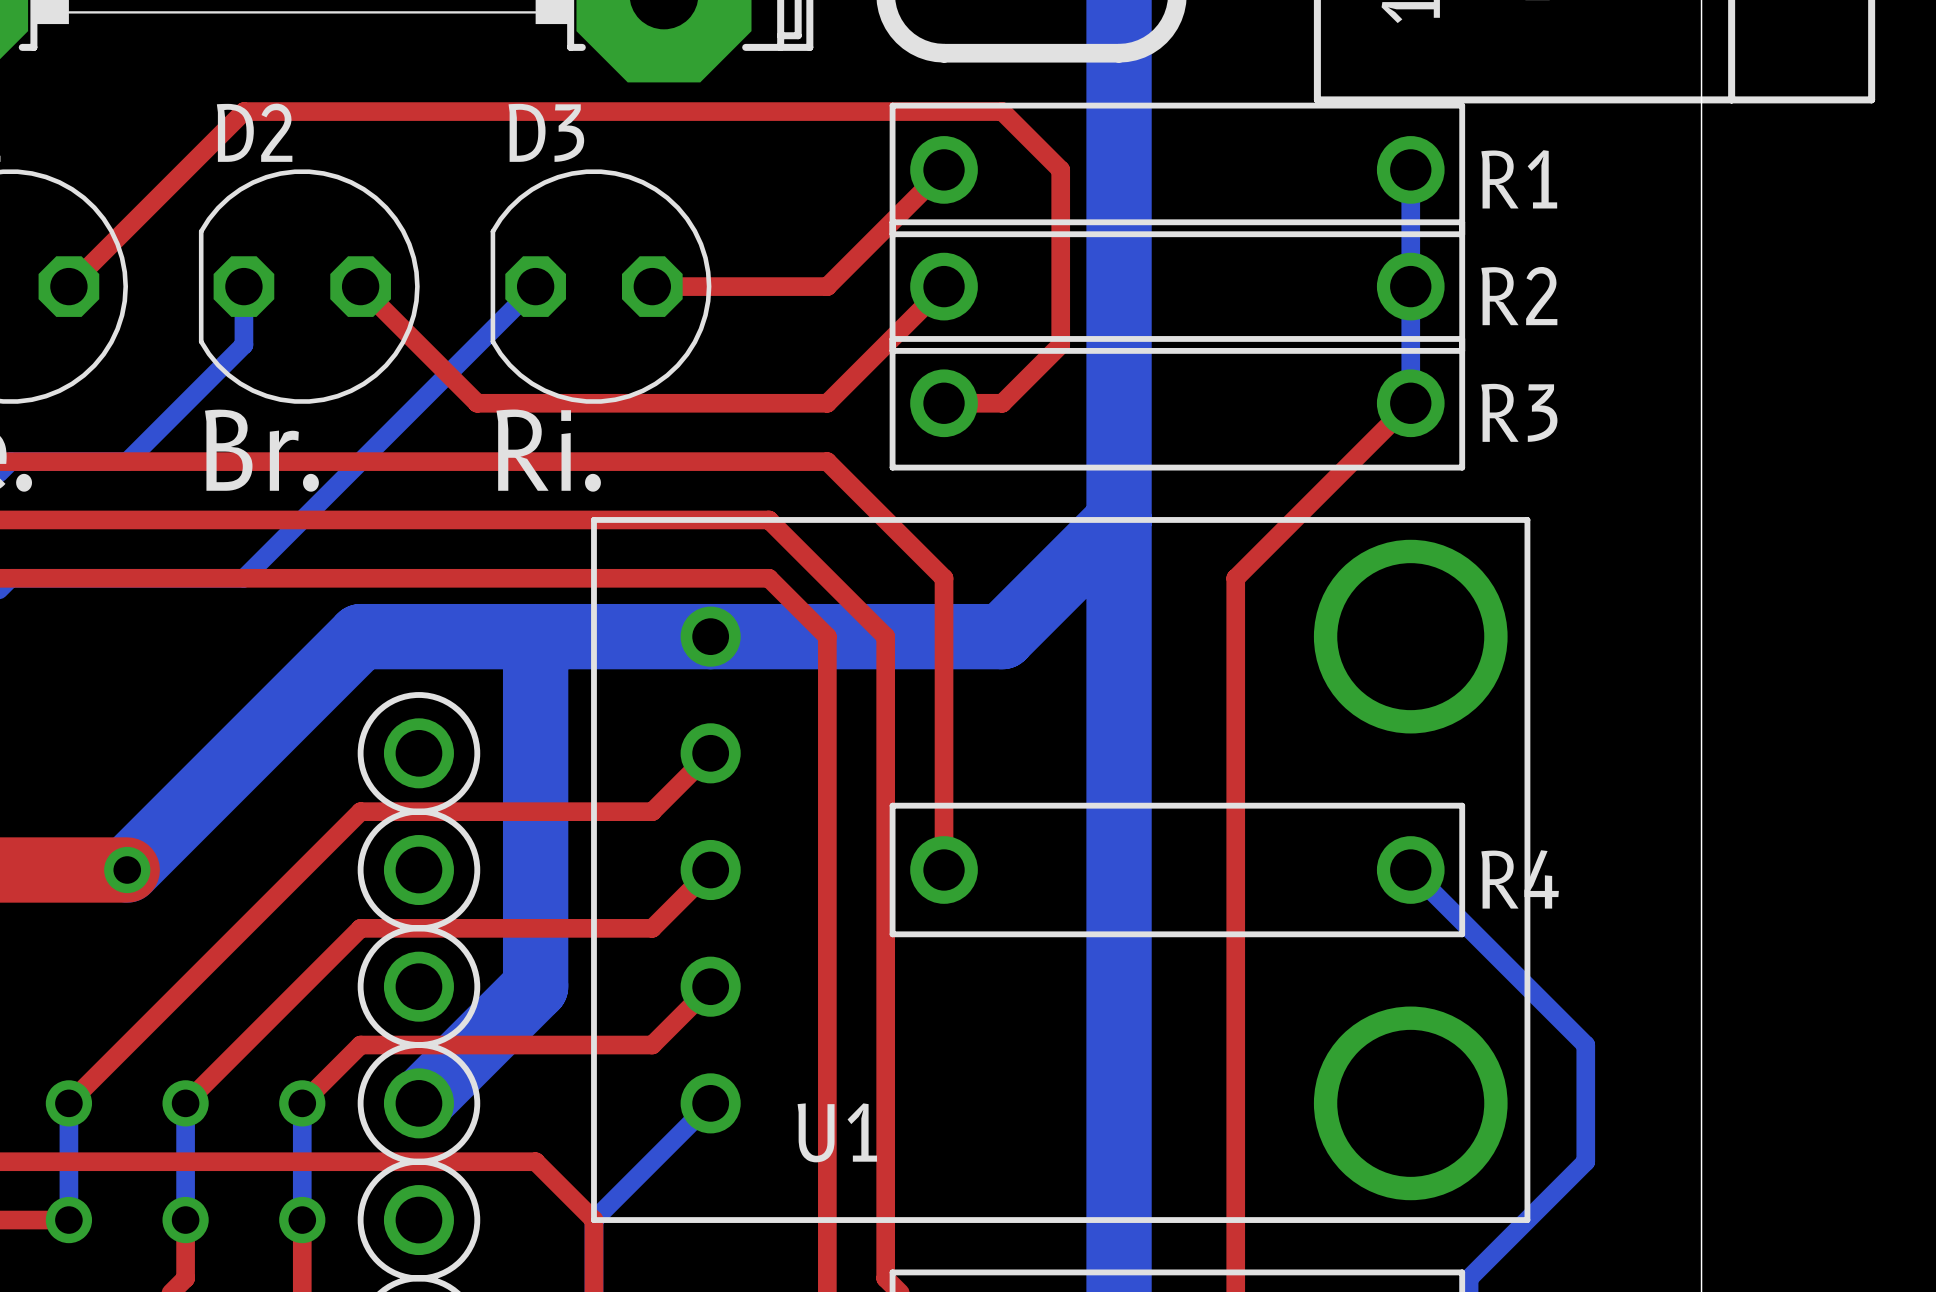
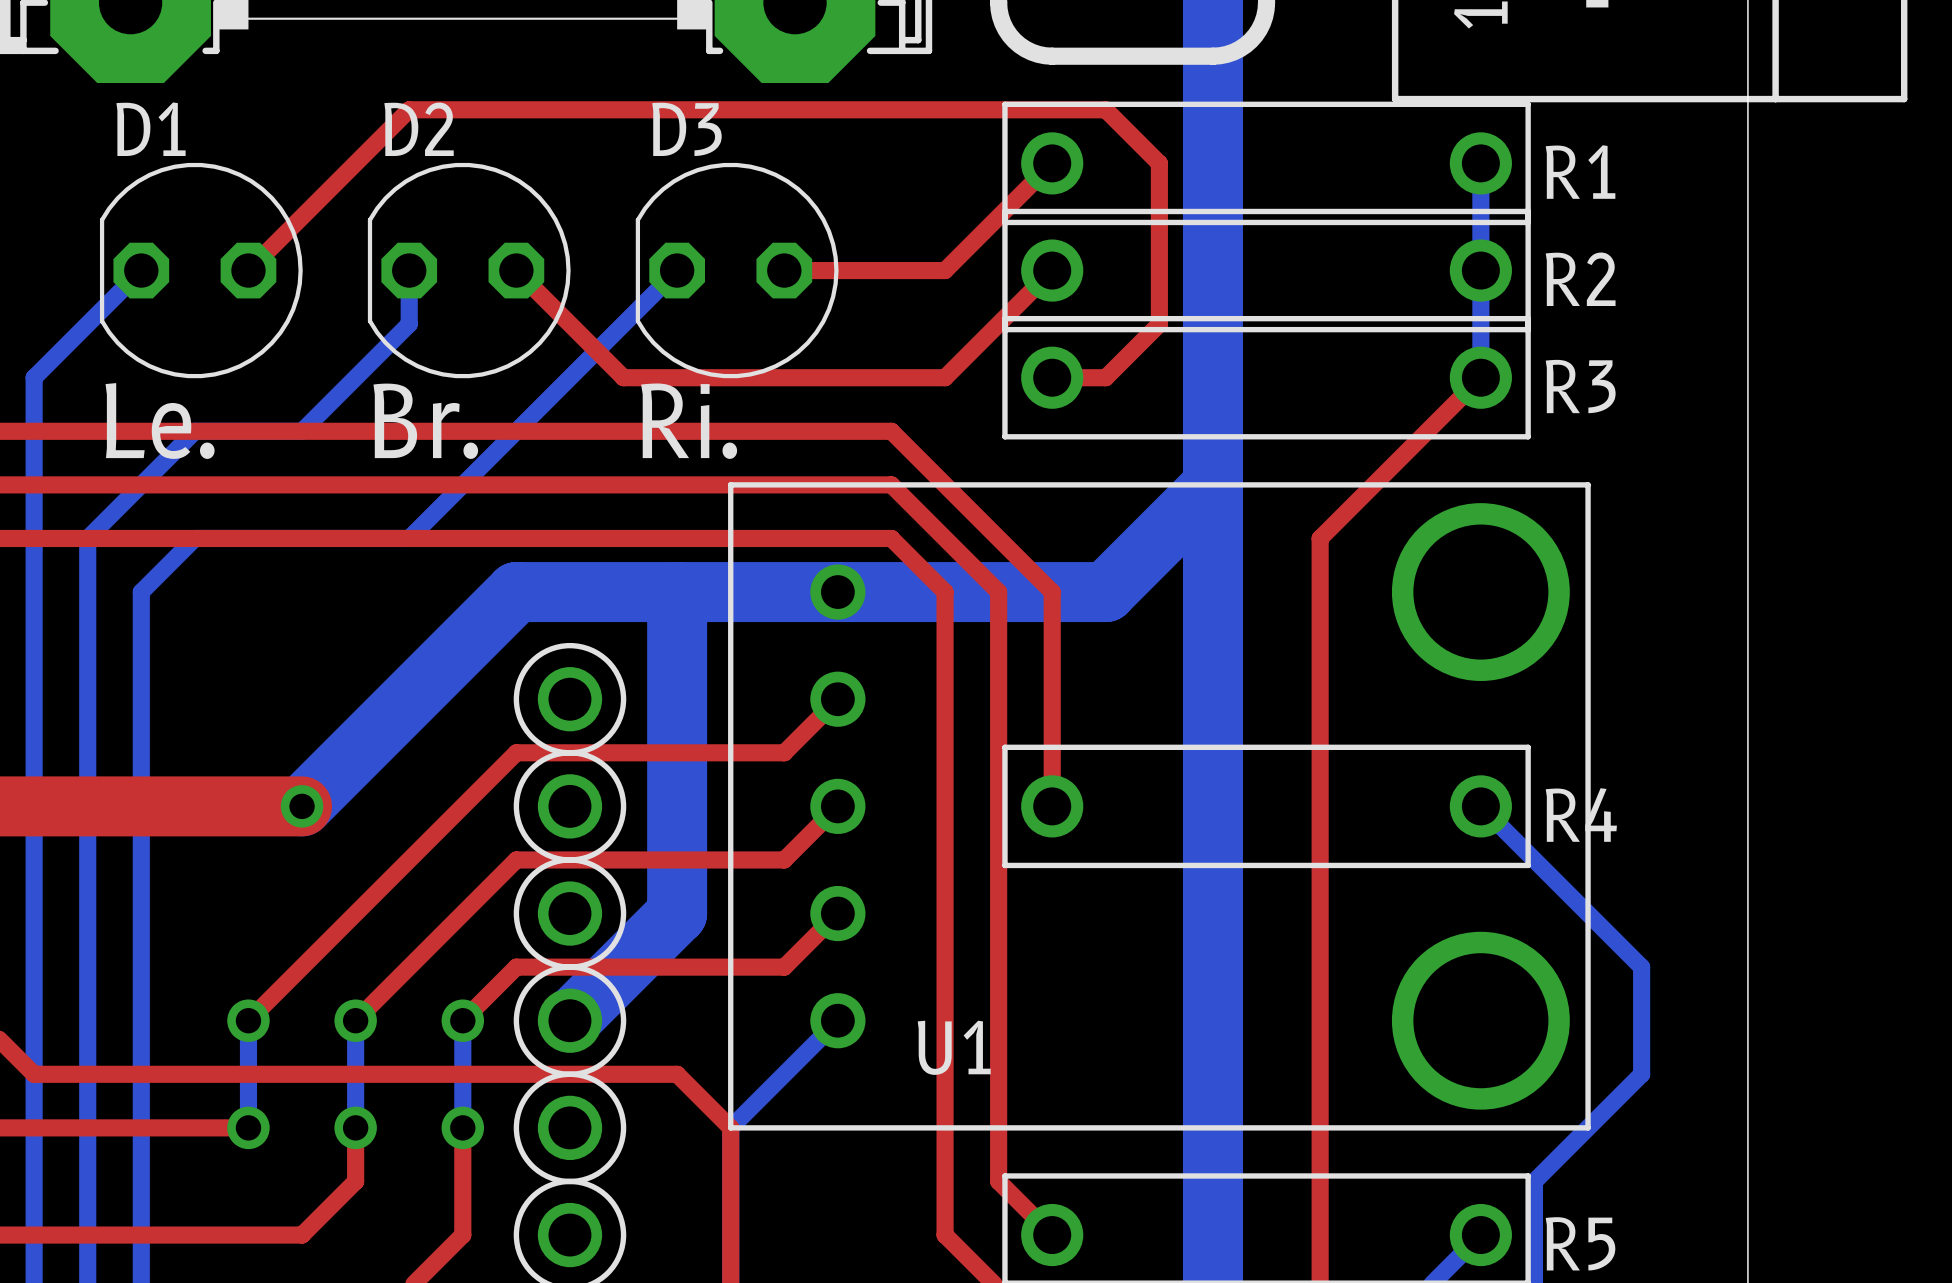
top track: (769, 461) (827, 461) (944, 578) (944, 636) -> (891, 431) (1052, 592)

